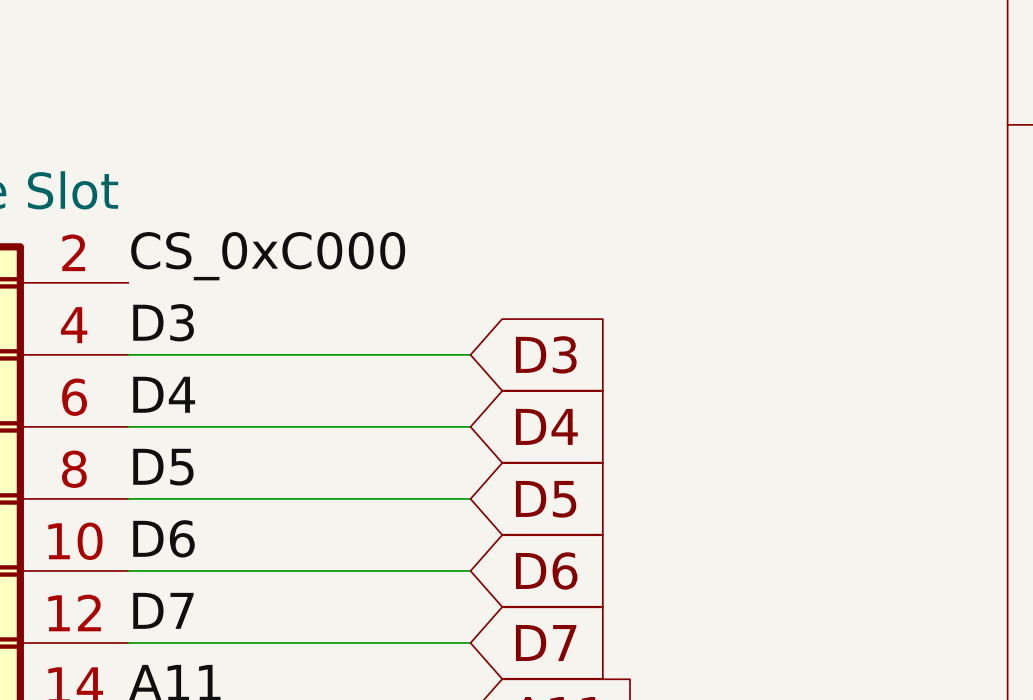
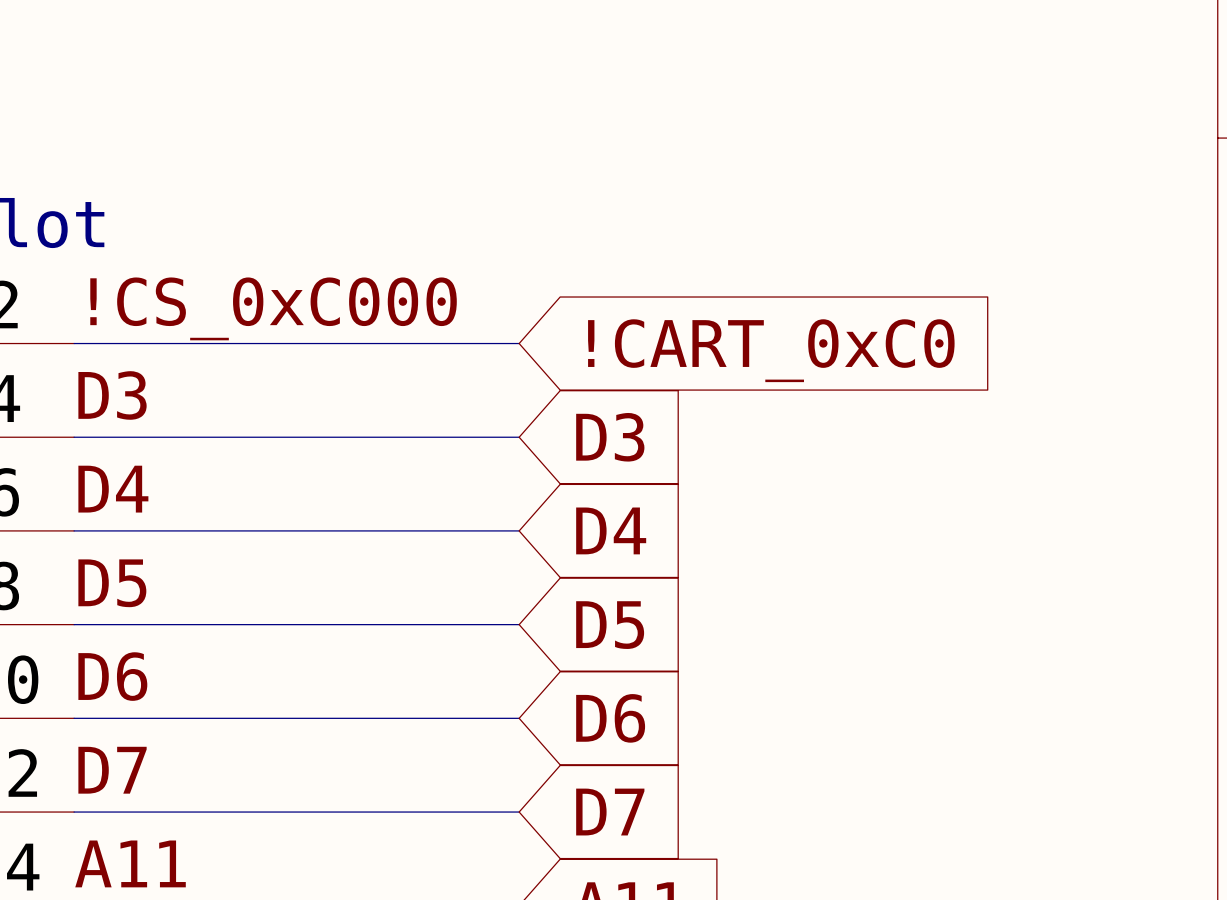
label: CS_0xC000 (268, 256) -> !CS_0xC000 (273, 308)
wire: none -> (74, 343) (519, 343)
global label: none -> !CART_0xC0 (771, 350)

